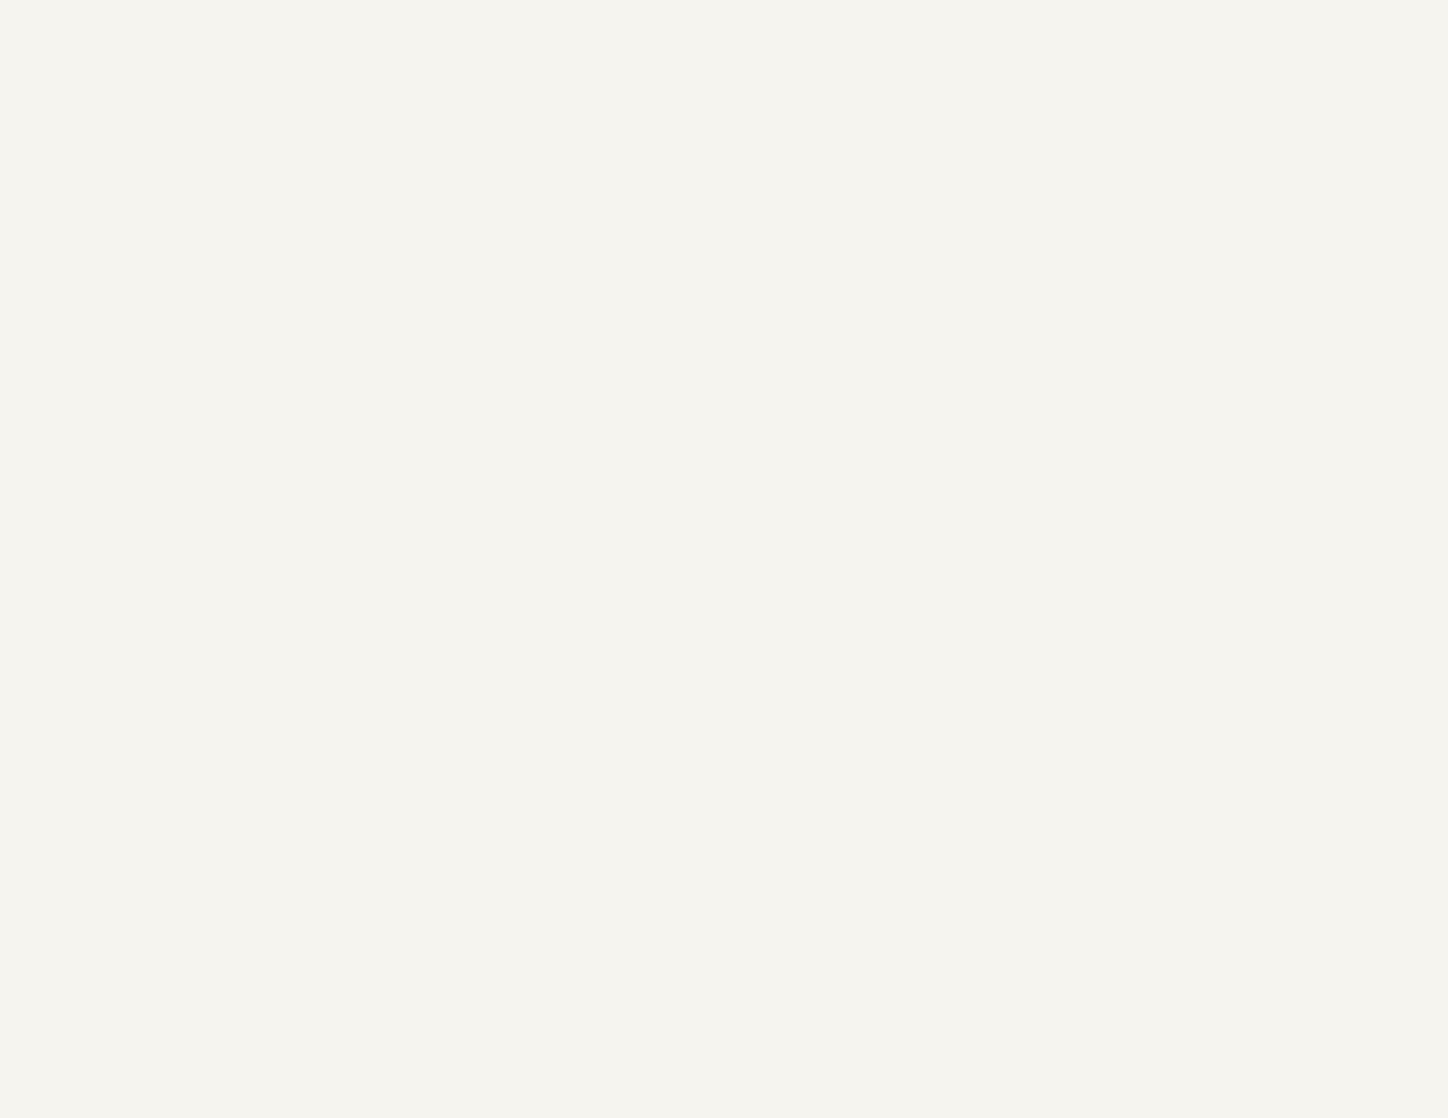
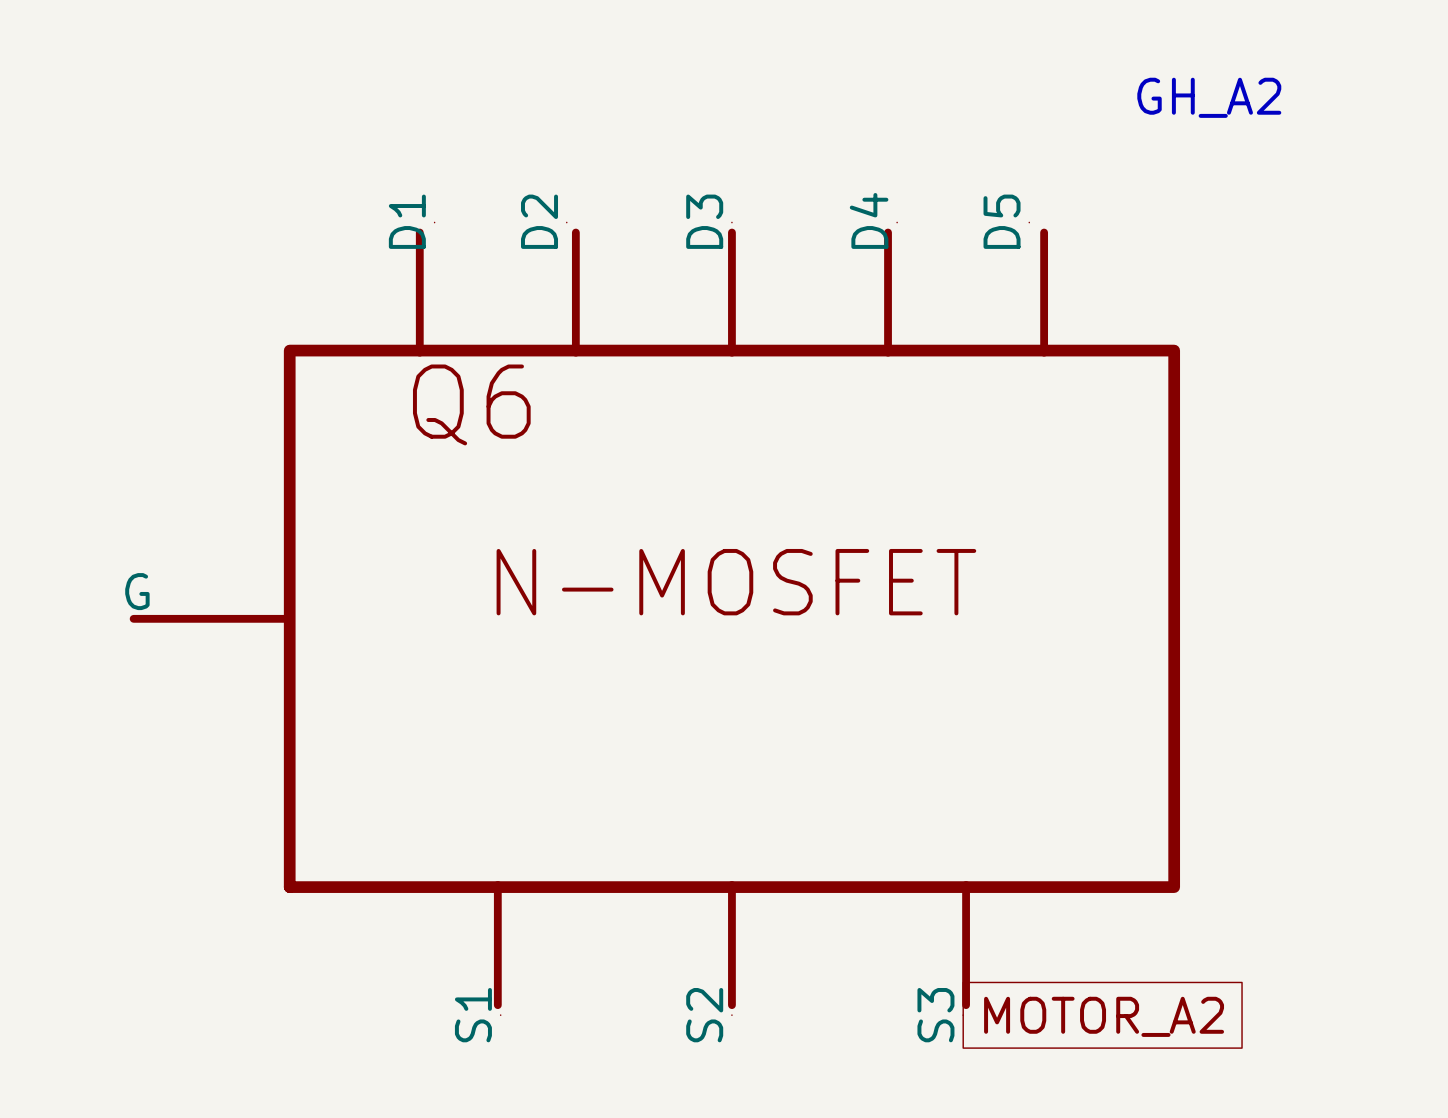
text: none -> GH_A2 (1209, 97)
part: none -> (654, 618)
global label: none -> MOTOR_A2 (1104, 1016)

